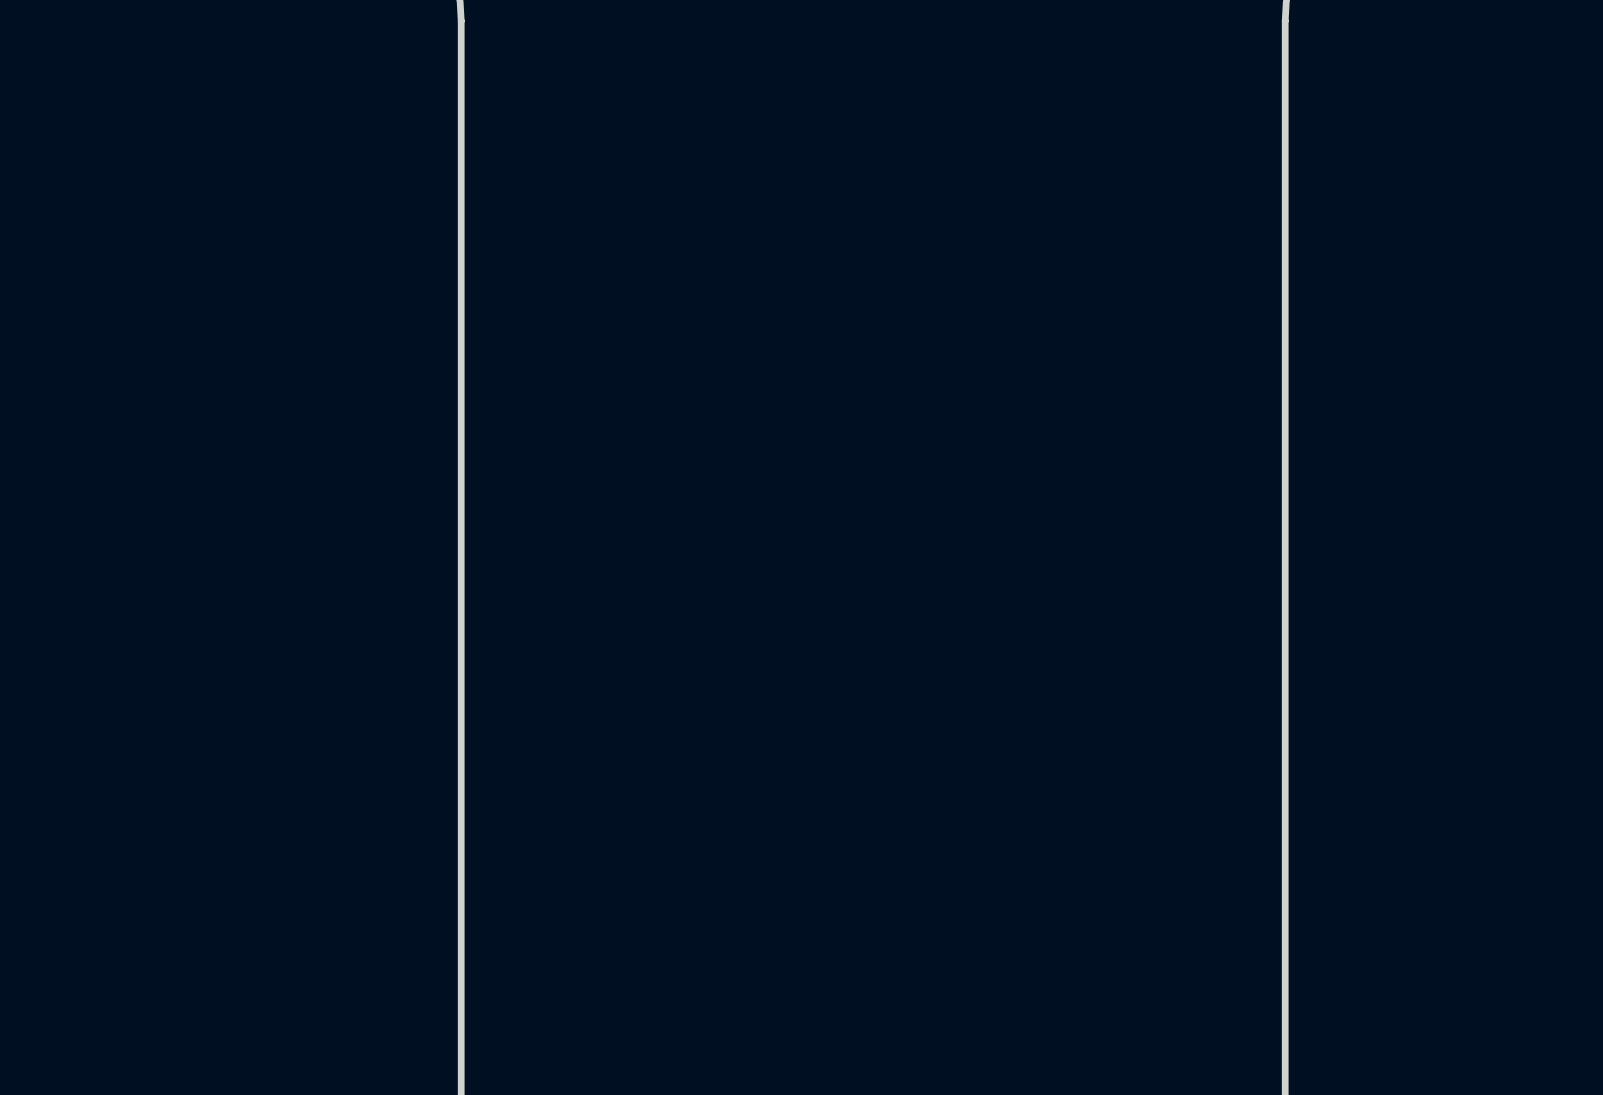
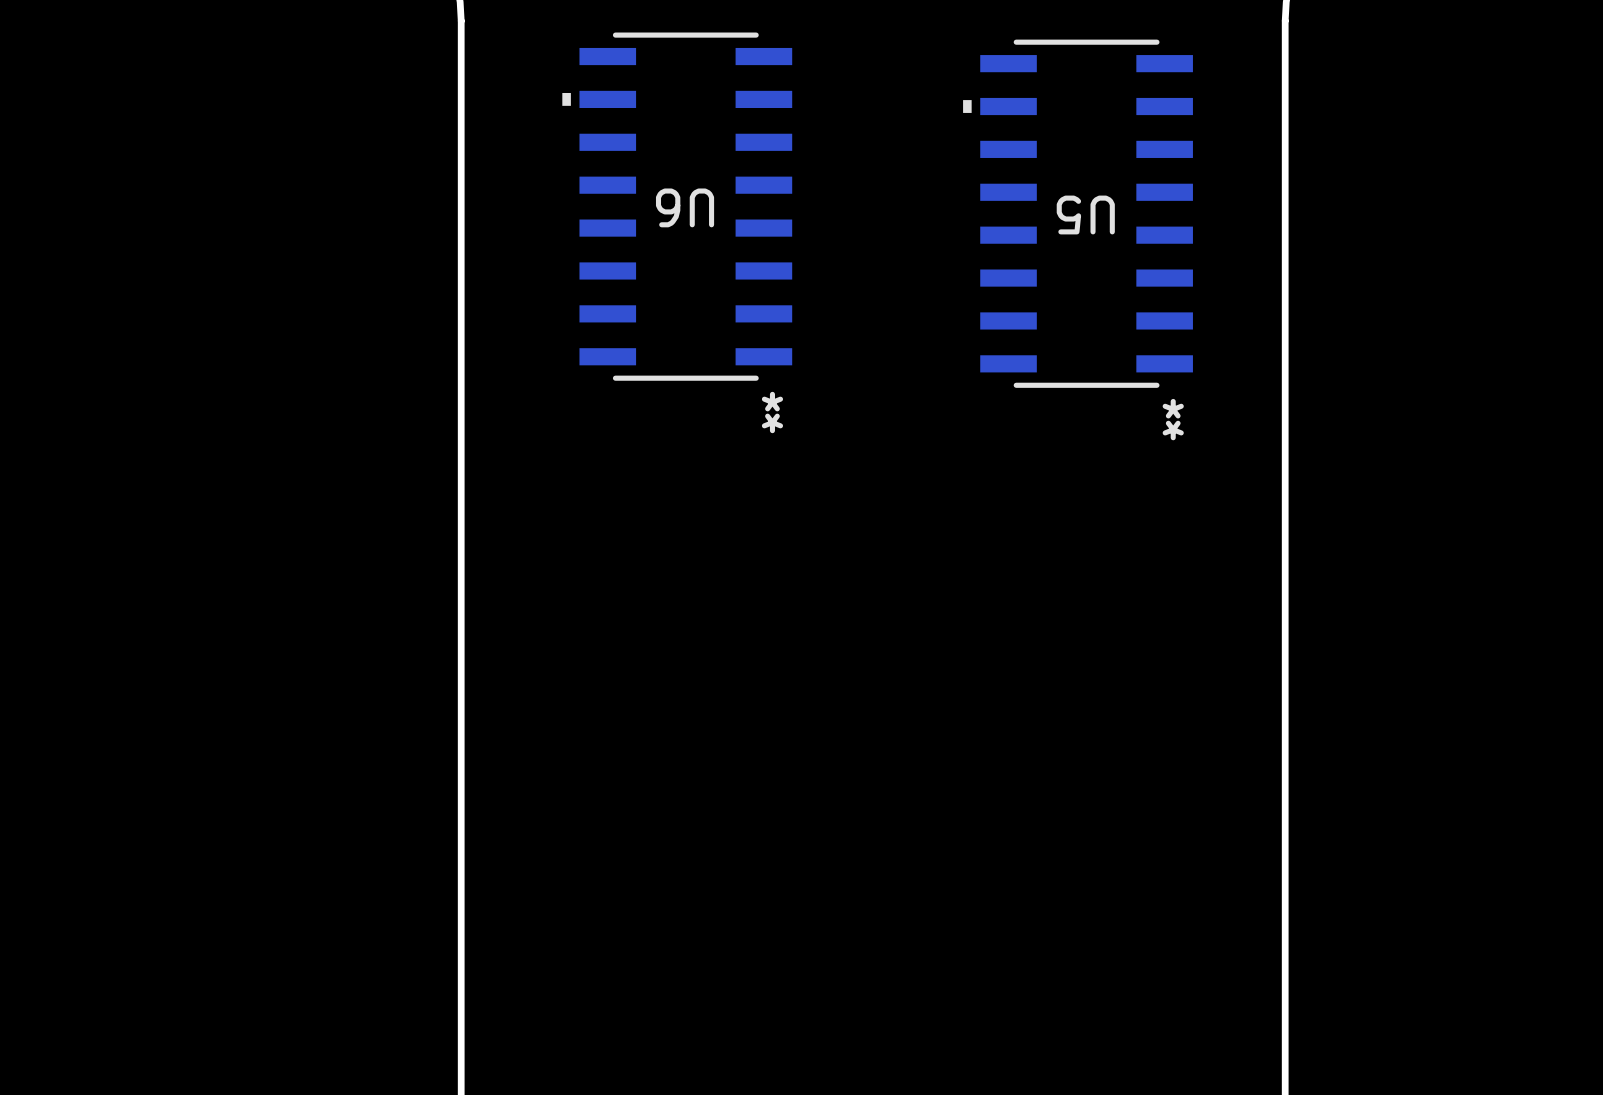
U6: none -> (677, 206)
U5: none -> (1078, 213)

